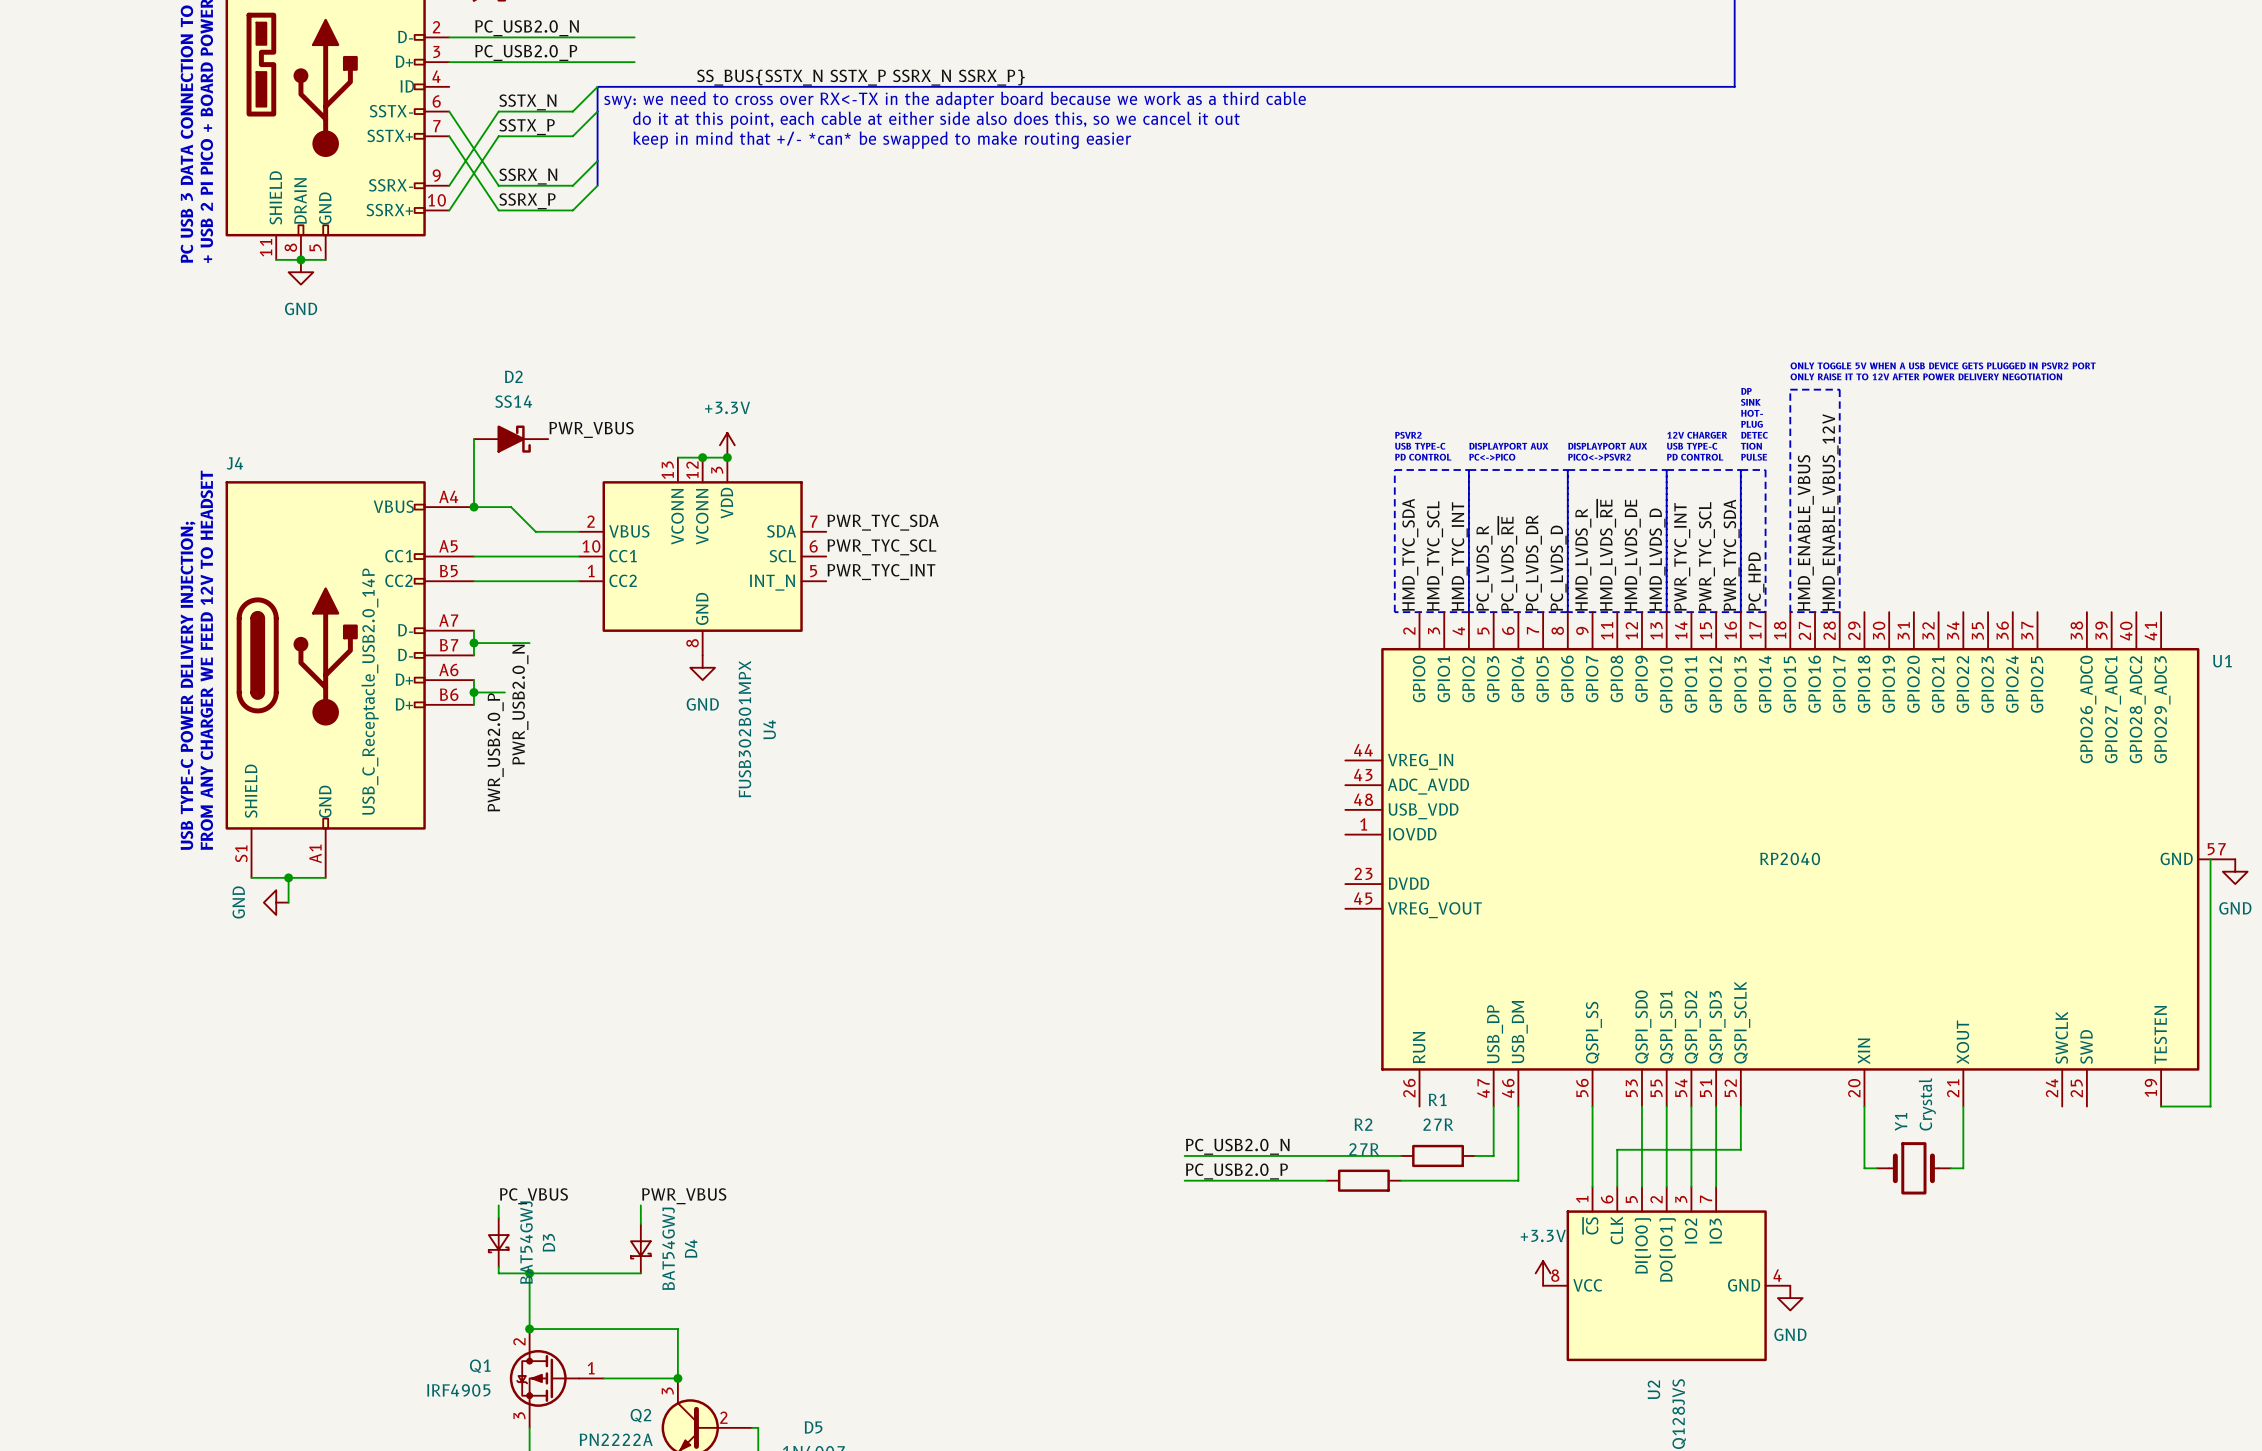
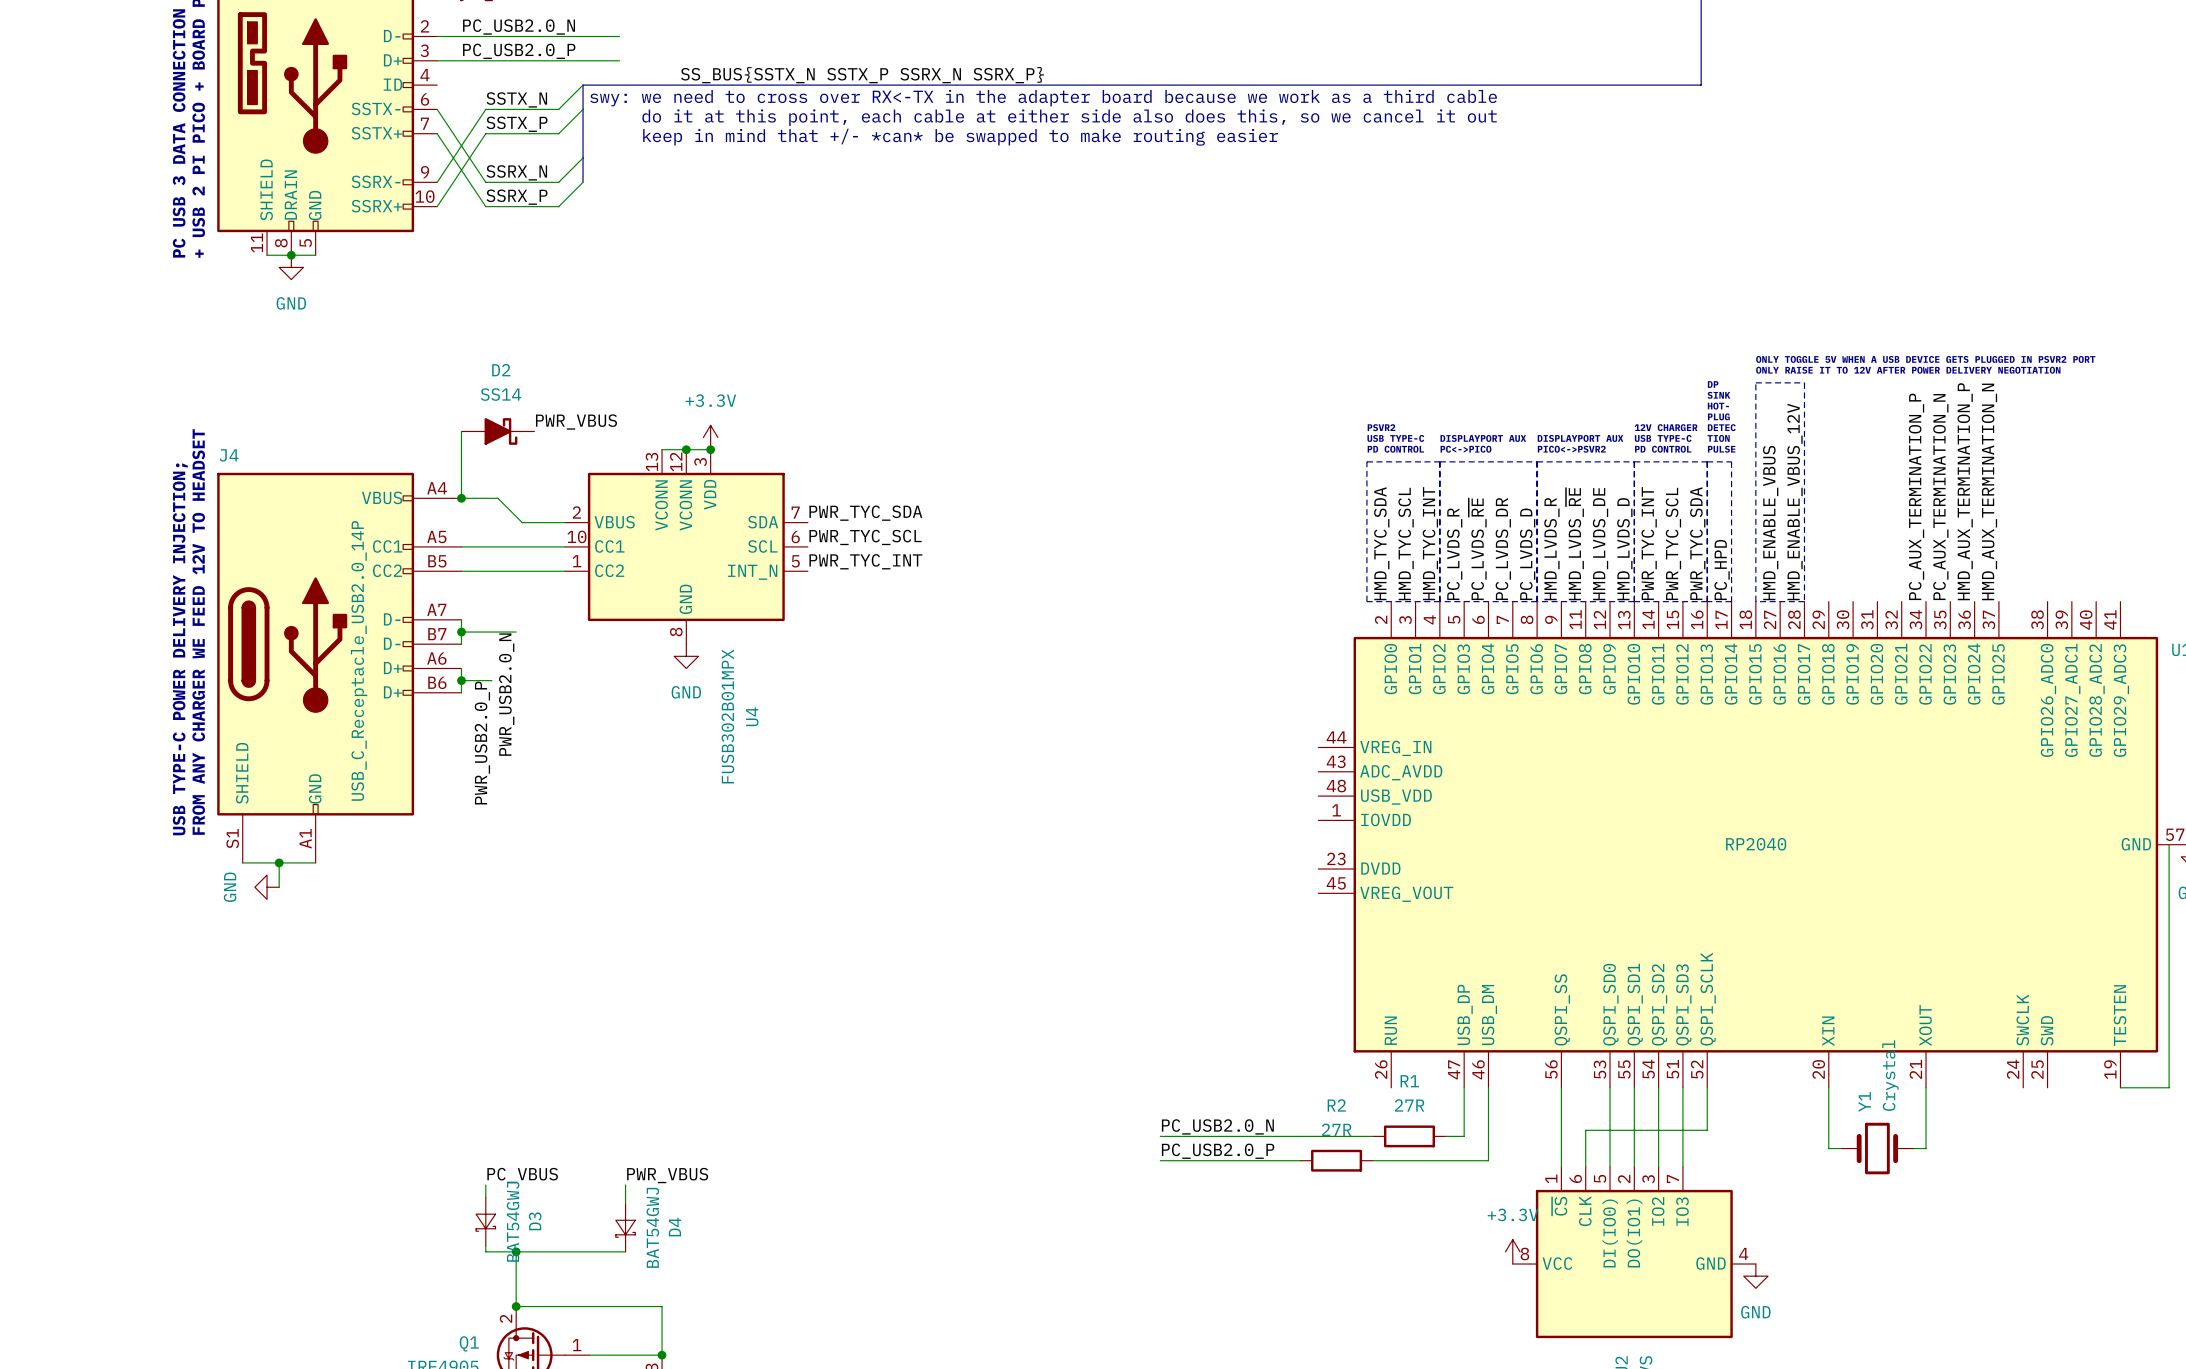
label: none -> HMD_AUX_TERMINATION_N (1989, 491)
label: none -> HMD_AUX_TERMINATION_P (1965, 491)
label: none -> PC_AUX_TERMINATION_N (1940, 497)
label: none -> PC_AUX_TERMINATION_P (1916, 496)

